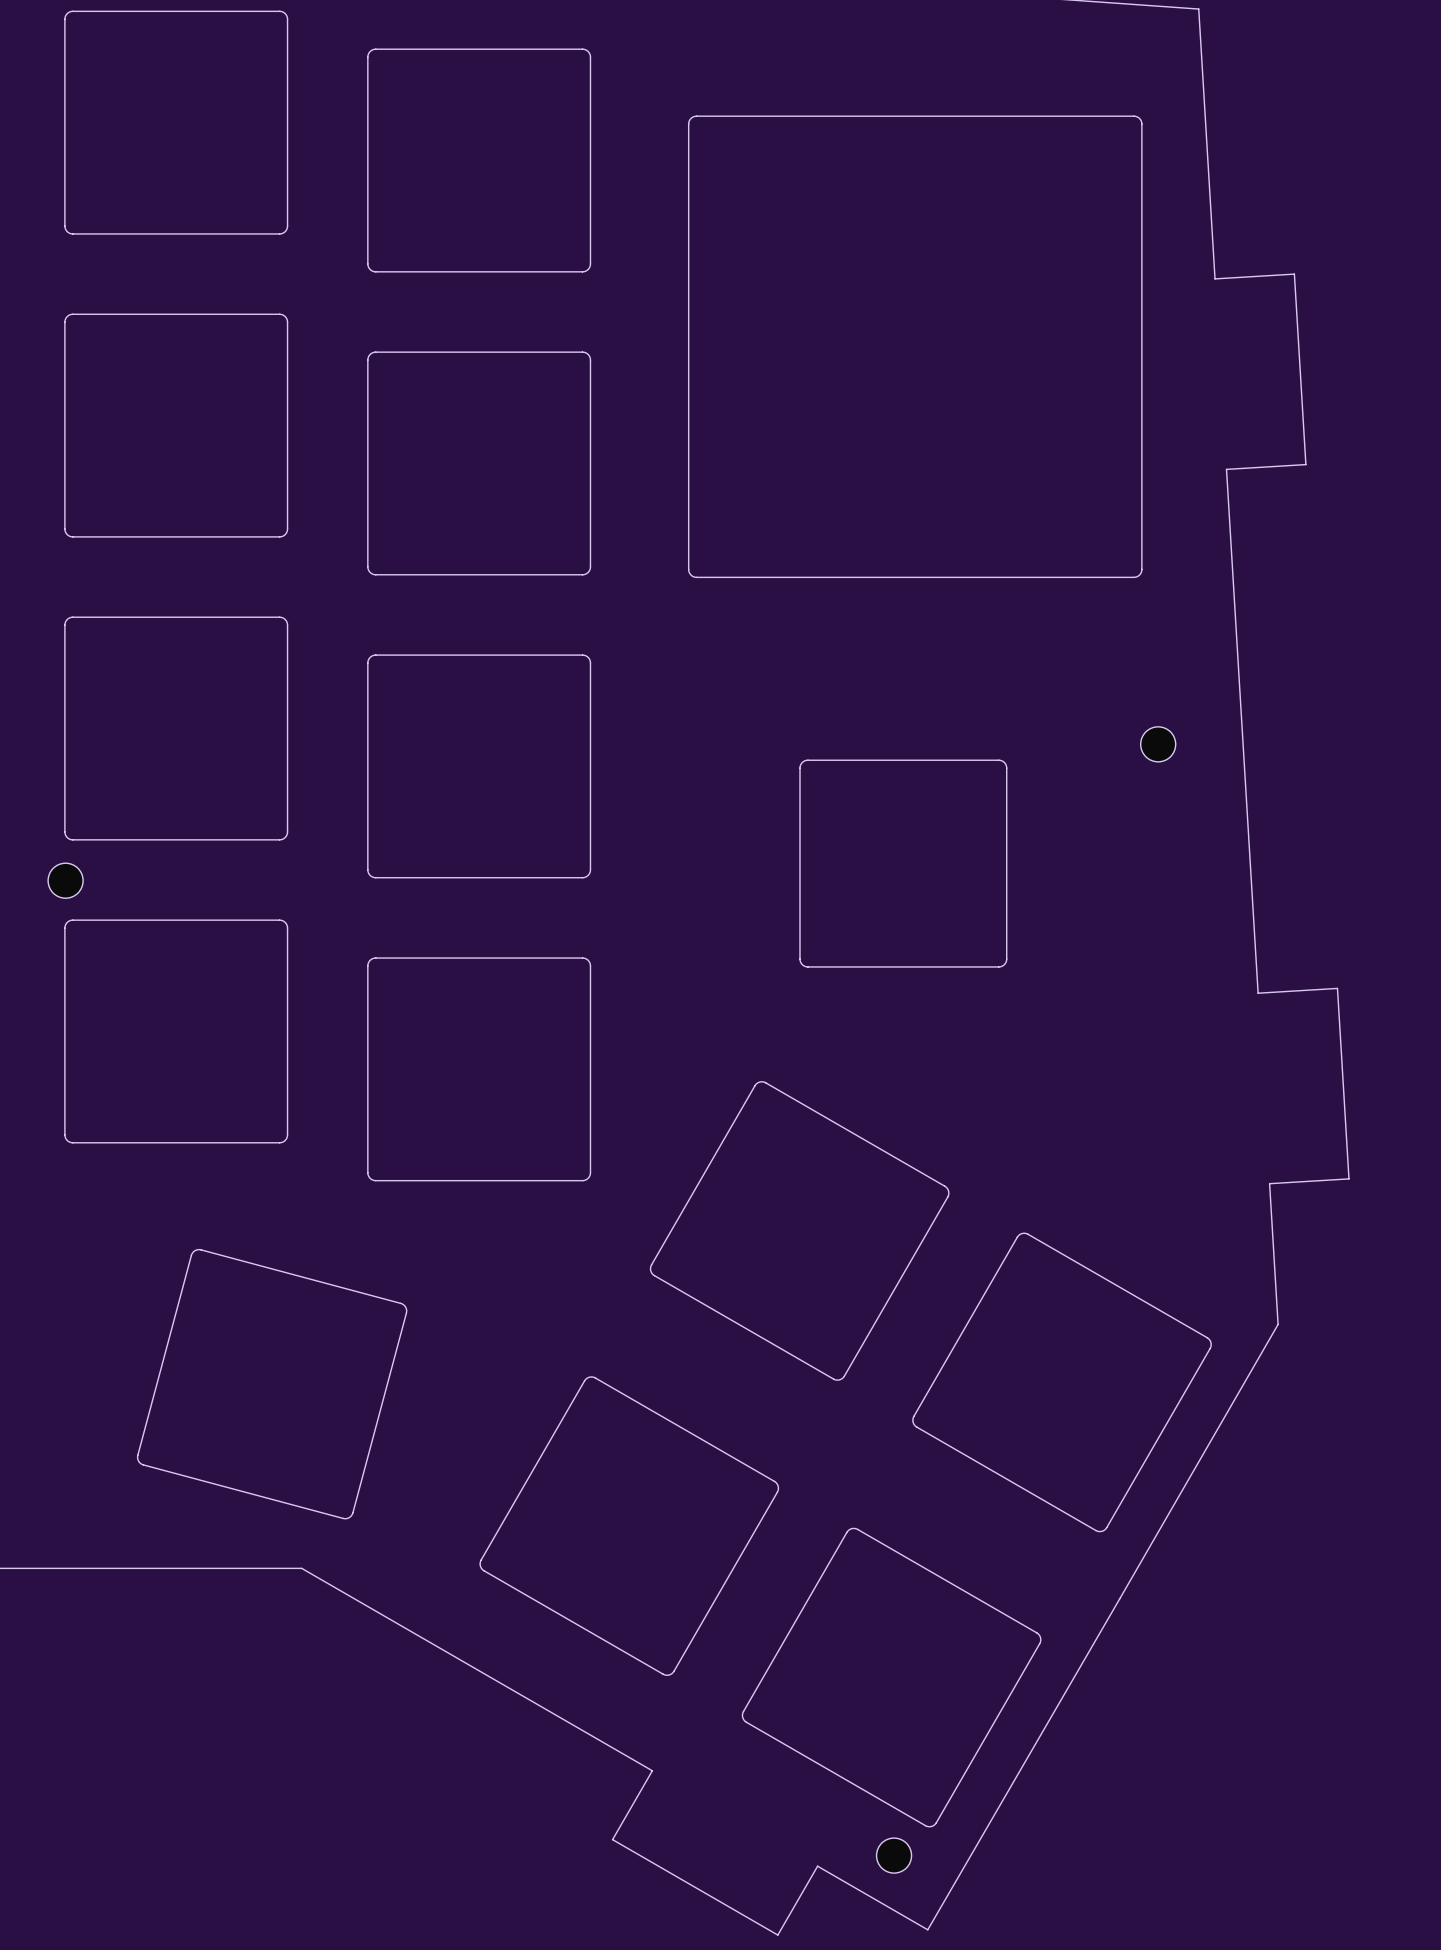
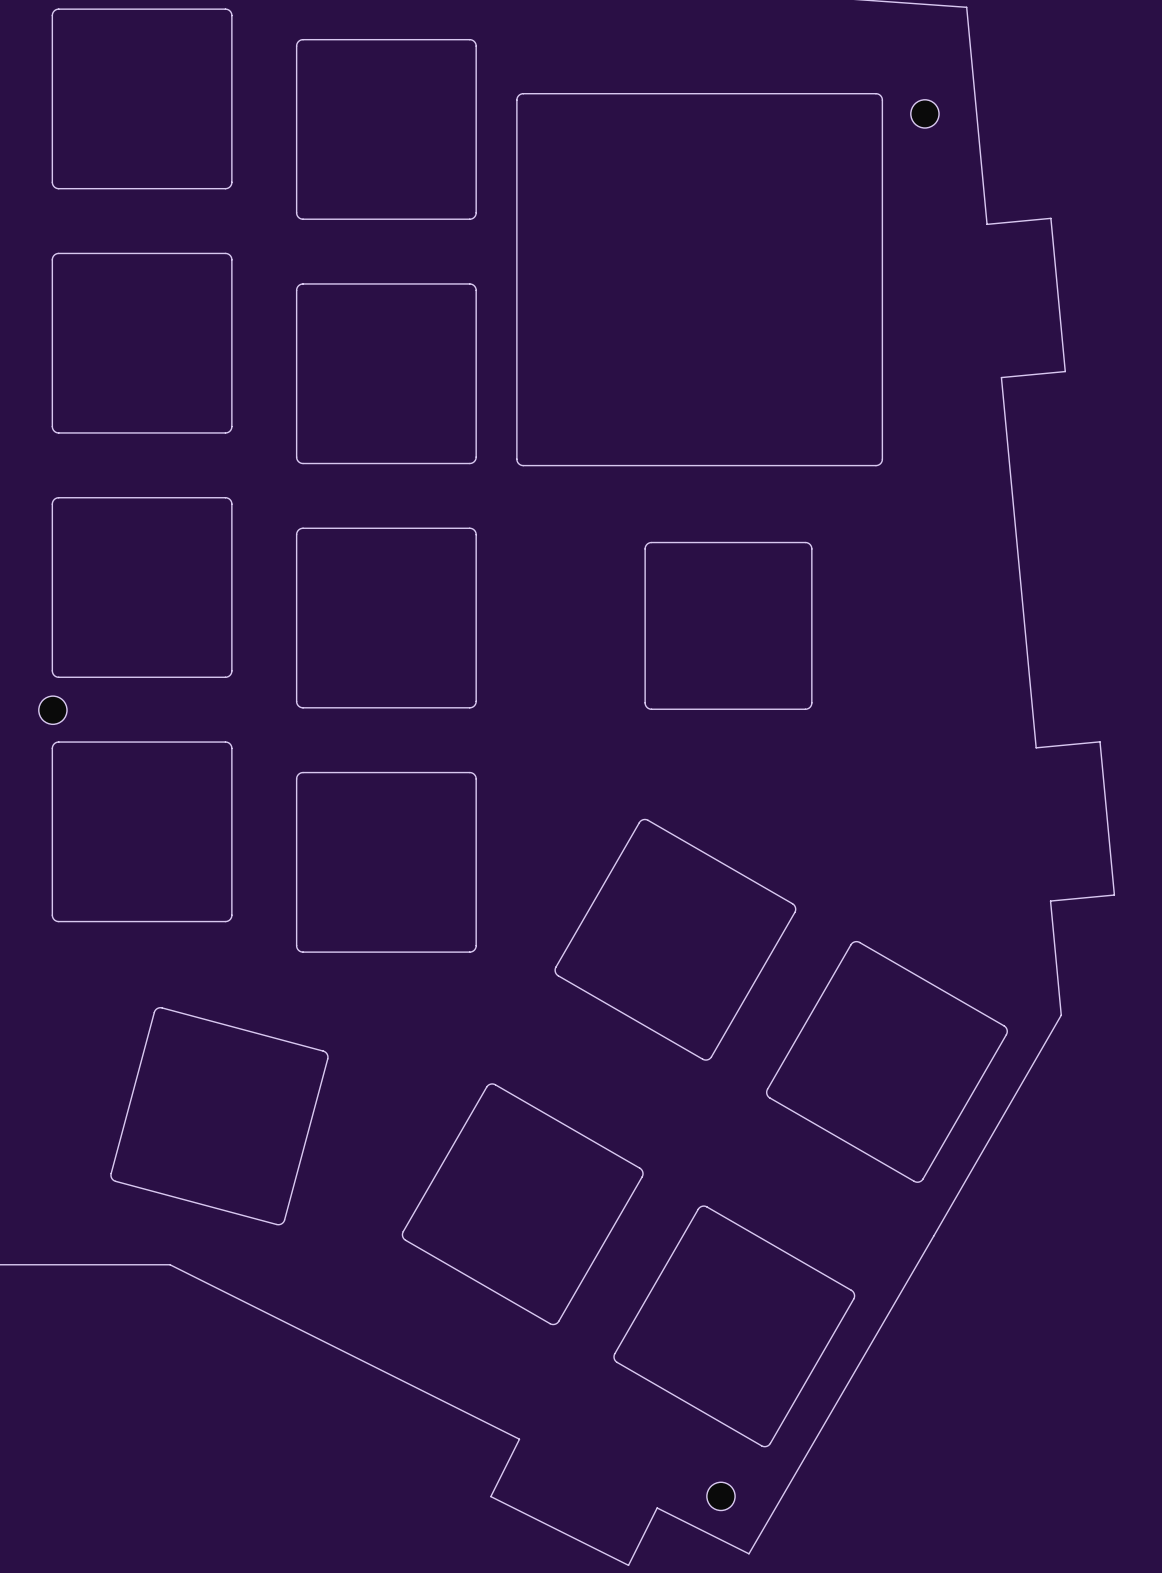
board edge: (1198, 9) (1215, 278) (1294, 274) (1305, 464) (1226, 469) (1258, 993) (1337, 988) (1348, 1178) (1269, 1183) (1278, 1324) (927, 1929) (817, 1866) (777, 1935) (612, 1839) (652, 1770) (301, 1568) (210, 1568) -> (966, 7) (987, 224) (1050, 218) (1065, 371) (1001, 377) (1036, 747) (1100, 741) (1114, 895) (1050, 901) (1061, 1015) (748, 1553) (657, 1507) (628, 1565) (490, 1496) (519, 1439) (170, 1264)
board edge: (696, 116) (691, 118) (688, 124) (688, 569) (691, 575) (696, 577) -> (561, 93) (522, 93) (518, 96) (516, 100) (516, 459) (522, 465) (561, 465)
board edge: (1086, 116) (1134, 116) (1139, 118) (1141, 124) (1141, 570) (1139, 575) (1134, 577) (1086, 577) -> (875, 93) (880, 95) (882, 100) (882, 459) (880, 463) (875, 465)
part: none -> (924, 113)
part: (1158, 744) -> none
board edge: (799, 768) (802, 762) (807, 760) (998, 760) (1004, 762) (1006, 768) -> (645, 619) (645, 548) (647, 543) (651, 542) (808, 543) (811, 548) (811, 619)
board edge: (799, 871) (800, 959) (802, 965) (807, 966) (1001, 966) (1006, 959) (1006, 871) -> (645, 702) (647, 707) (651, 709) (805, 709) (809, 707) (811, 702)
board edge: (754, 1085) (759, 1082) (765, 1082) (944, 1186) (948, 1191) (947, 1197) -> (608, 875) (639, 822) (646, 819) (792, 903) (795, 906) (795, 911) (764, 965)
board edge: (689, 1199) (651, 1265) (650, 1270) (654, 1275) (836, 1379) (843, 1376) (882, 1310) -> (555, 967) (555, 971) (558, 975) (702, 1059) (707, 1059) (711, 1056)
board edge: (1017, 1237) (1022, 1233) (1028, 1234) (1207, 1337) (1210, 1342) (1210, 1348) -> (820, 997) (851, 944) (857, 941) (1004, 1025) (1007, 1029) (1006, 1033) (975, 1087)
board edge: (951, 1350) (913, 1417) (913, 1423) (916, 1427) (1098, 1531) (1106, 1528) (1144, 1462) -> (767, 1089) (766, 1094) (769, 1097) (914, 1181) (919, 1181) (923, 1178)
board edge: (584, 1380) (589, 1377) (595, 1378) (774, 1481) (778, 1486) (777, 1492) -> (471, 1113) (487, 1086) (494, 1084) (639, 1168) (642, 1175) (626, 1203)
board edge: (500, 1527) (480, 1561) (480, 1566) (484, 1570) (665, 1674) (673, 1672) (692, 1638) -> (403, 1231) (402, 1236) (405, 1240) (550, 1323) (554, 1324) (558, 1321)
board edge: (846, 1532) (851, 1528) (857, 1529) (1036, 1632) (1040, 1637) (1039, 1643) -> (682, 1235) (698, 1208) (705, 1206) (851, 1290) (854, 1293) (854, 1298) (838, 1325)
board edge: (762, 1678) (742, 1713) (743, 1718) (746, 1722) (927, 1826) (935, 1823) (955, 1789) -> (614, 1353) (614, 1358) (617, 1362) (761, 1445) (766, 1446) (770, 1443)

